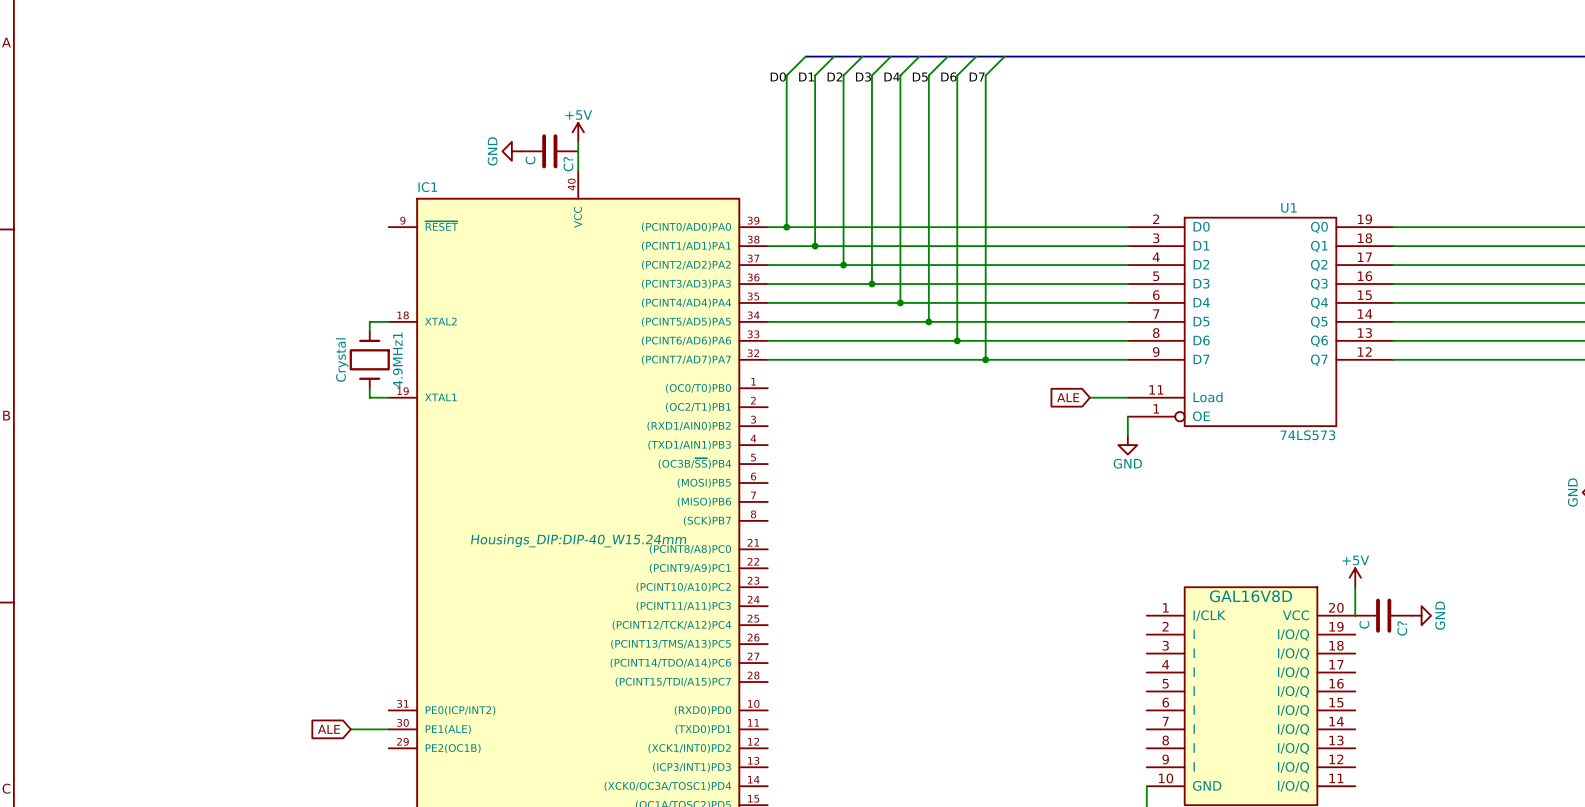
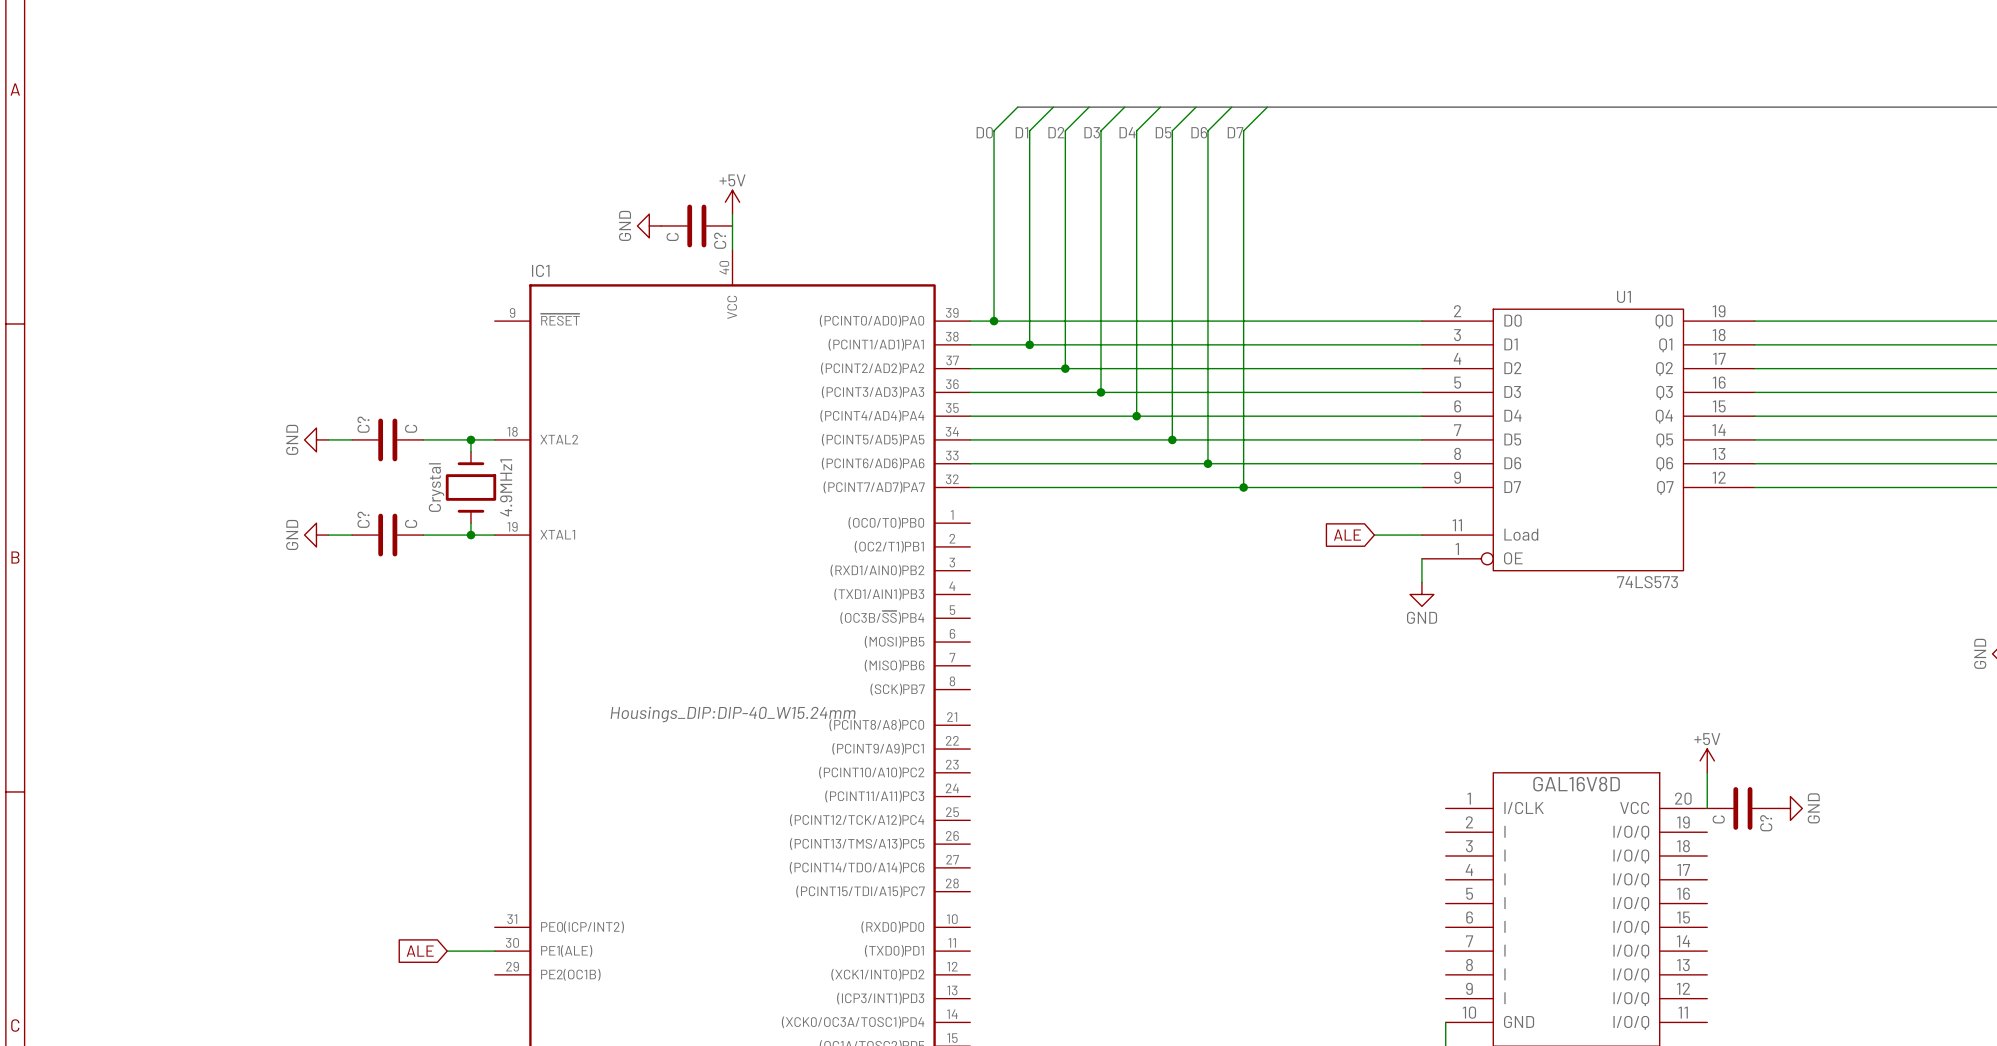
power symbol: none -> GND (316, 439)
wire: none -> (328, 439) (352, 439)
C?: none -> C (387, 439)
wire: none -> (423, 439) (470, 439)
junction: none -> (470, 439)
power symbol: none -> GND (316, 535)
wire: none -> (328, 535) (352, 535)
C?: none -> C (387, 535)
wire: none -> (423, 535) (470, 535)
junction: none -> (470, 535)

